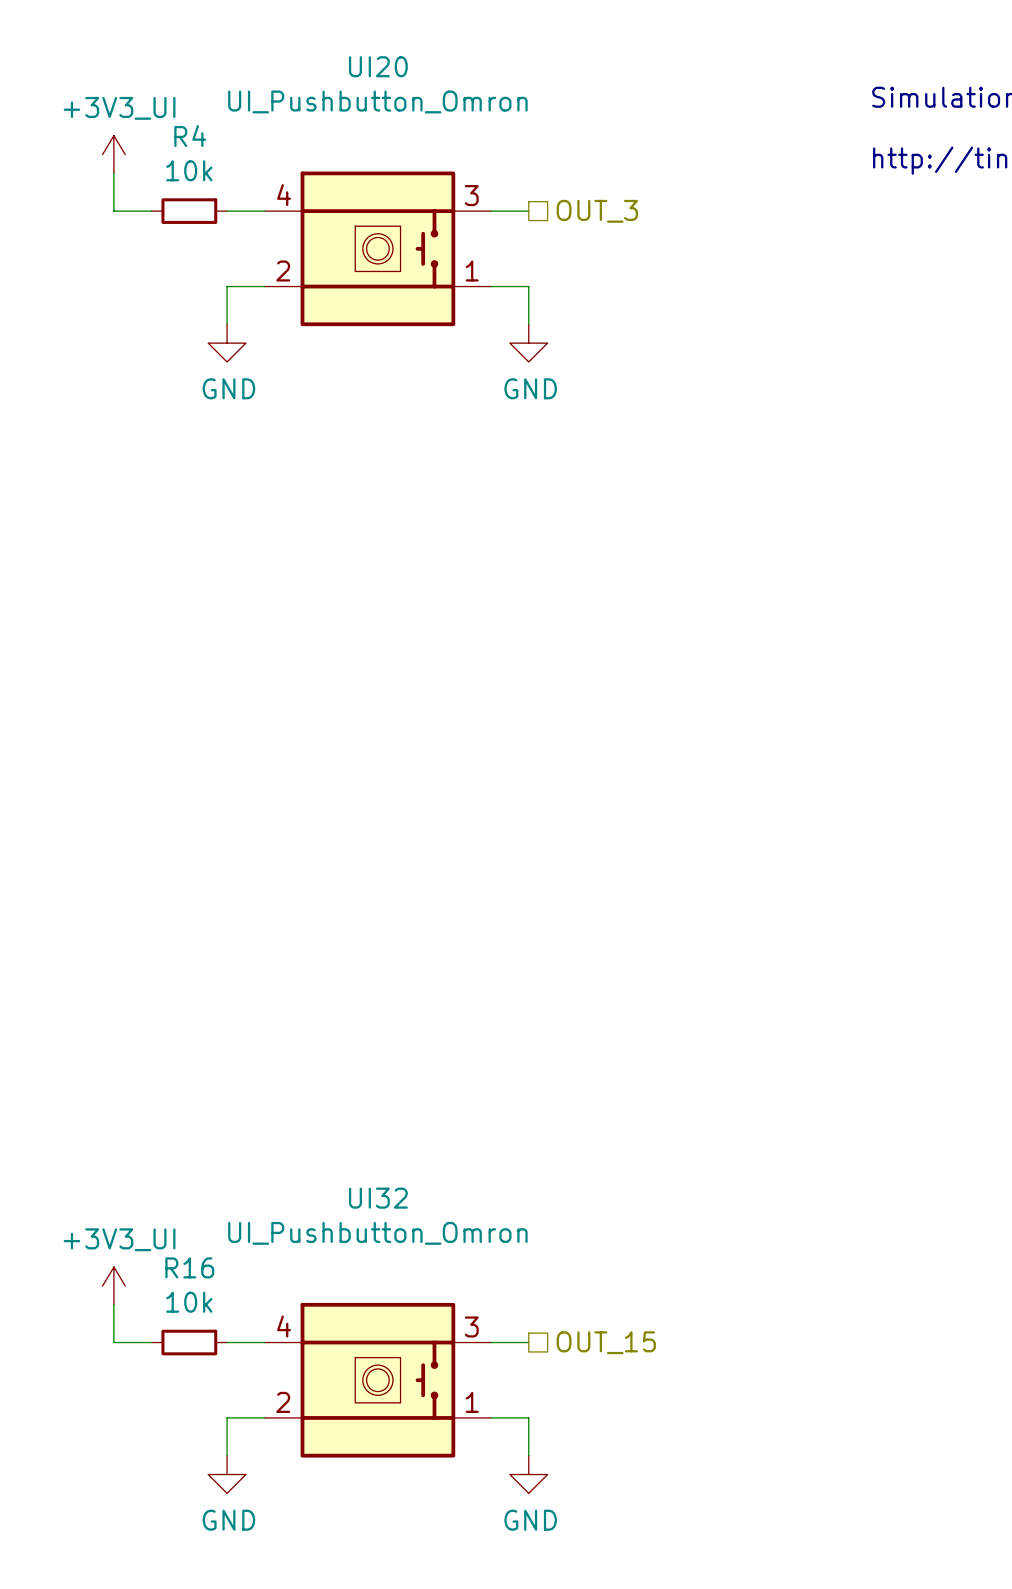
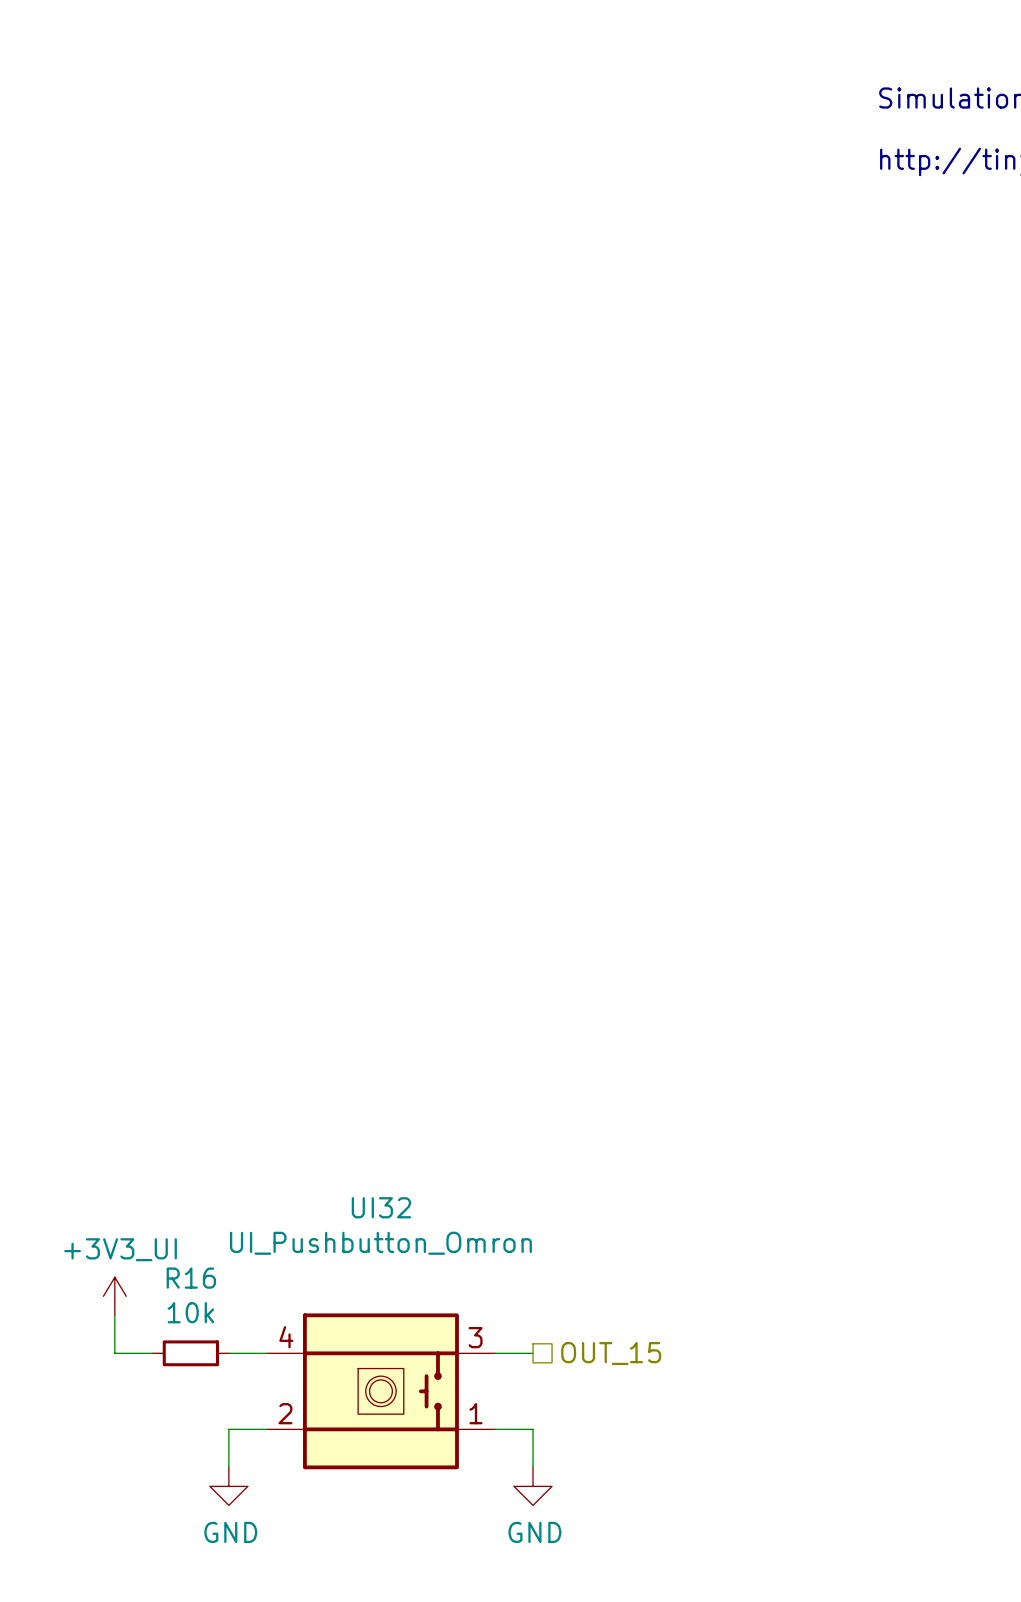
power symbol: +3V3_UI (113, 154) -> none
wire: (113, 173) (113, 211) (151, 211) -> none
R4: 10k (189, 211) -> none
wire: (227, 211) (264, 211) -> none
wire: (491, 211) (528, 211) -> none
hierarchical label: OUT_3 (597, 211) -> none
UI20: UI_Pushbutton_Omron (377, 248) -> none
wire: (264, 286) (227, 286) (227, 324) -> none
wire: (491, 286) (528, 286) (528, 324) -> none
power symbol: GND (227, 343) -> none
power symbol: GND (528, 343) -> none

